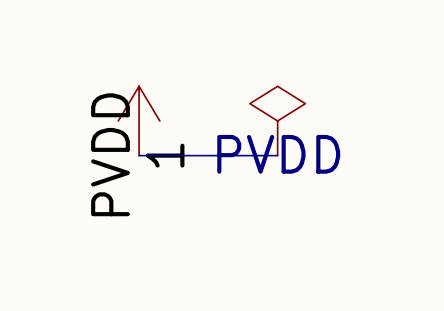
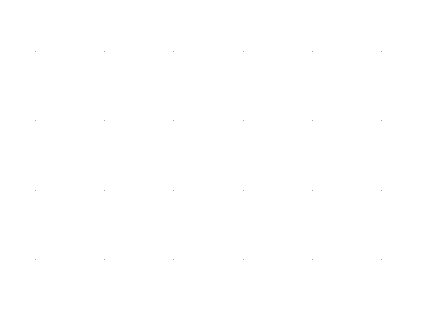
power symbol: PVDD (139, 120) -> none
power symbol: (277, 120) -> none
wire: (139, 155) (277, 155) -> none

